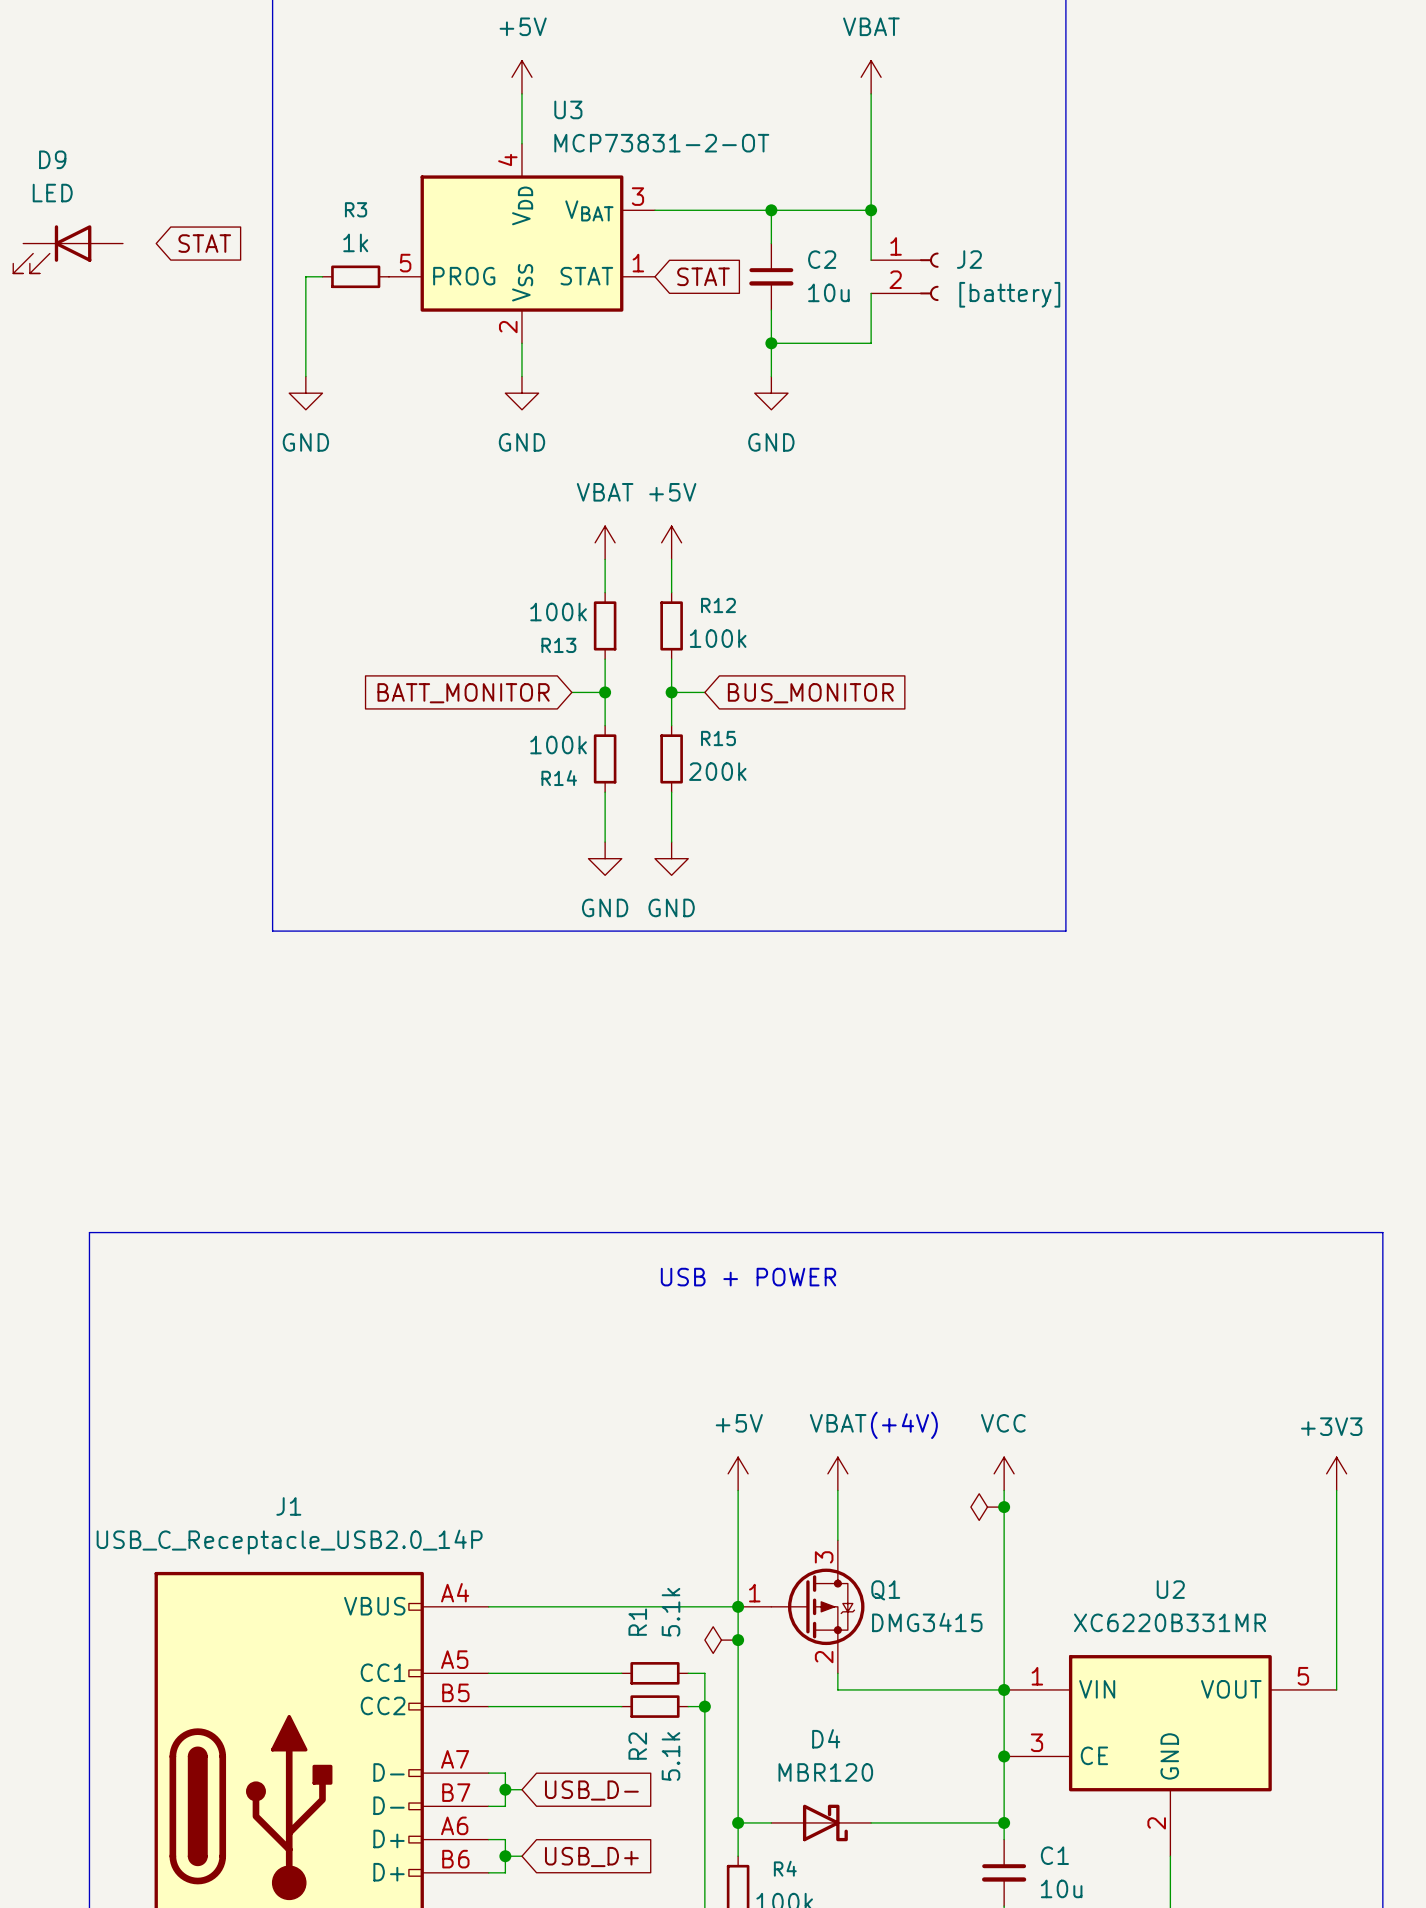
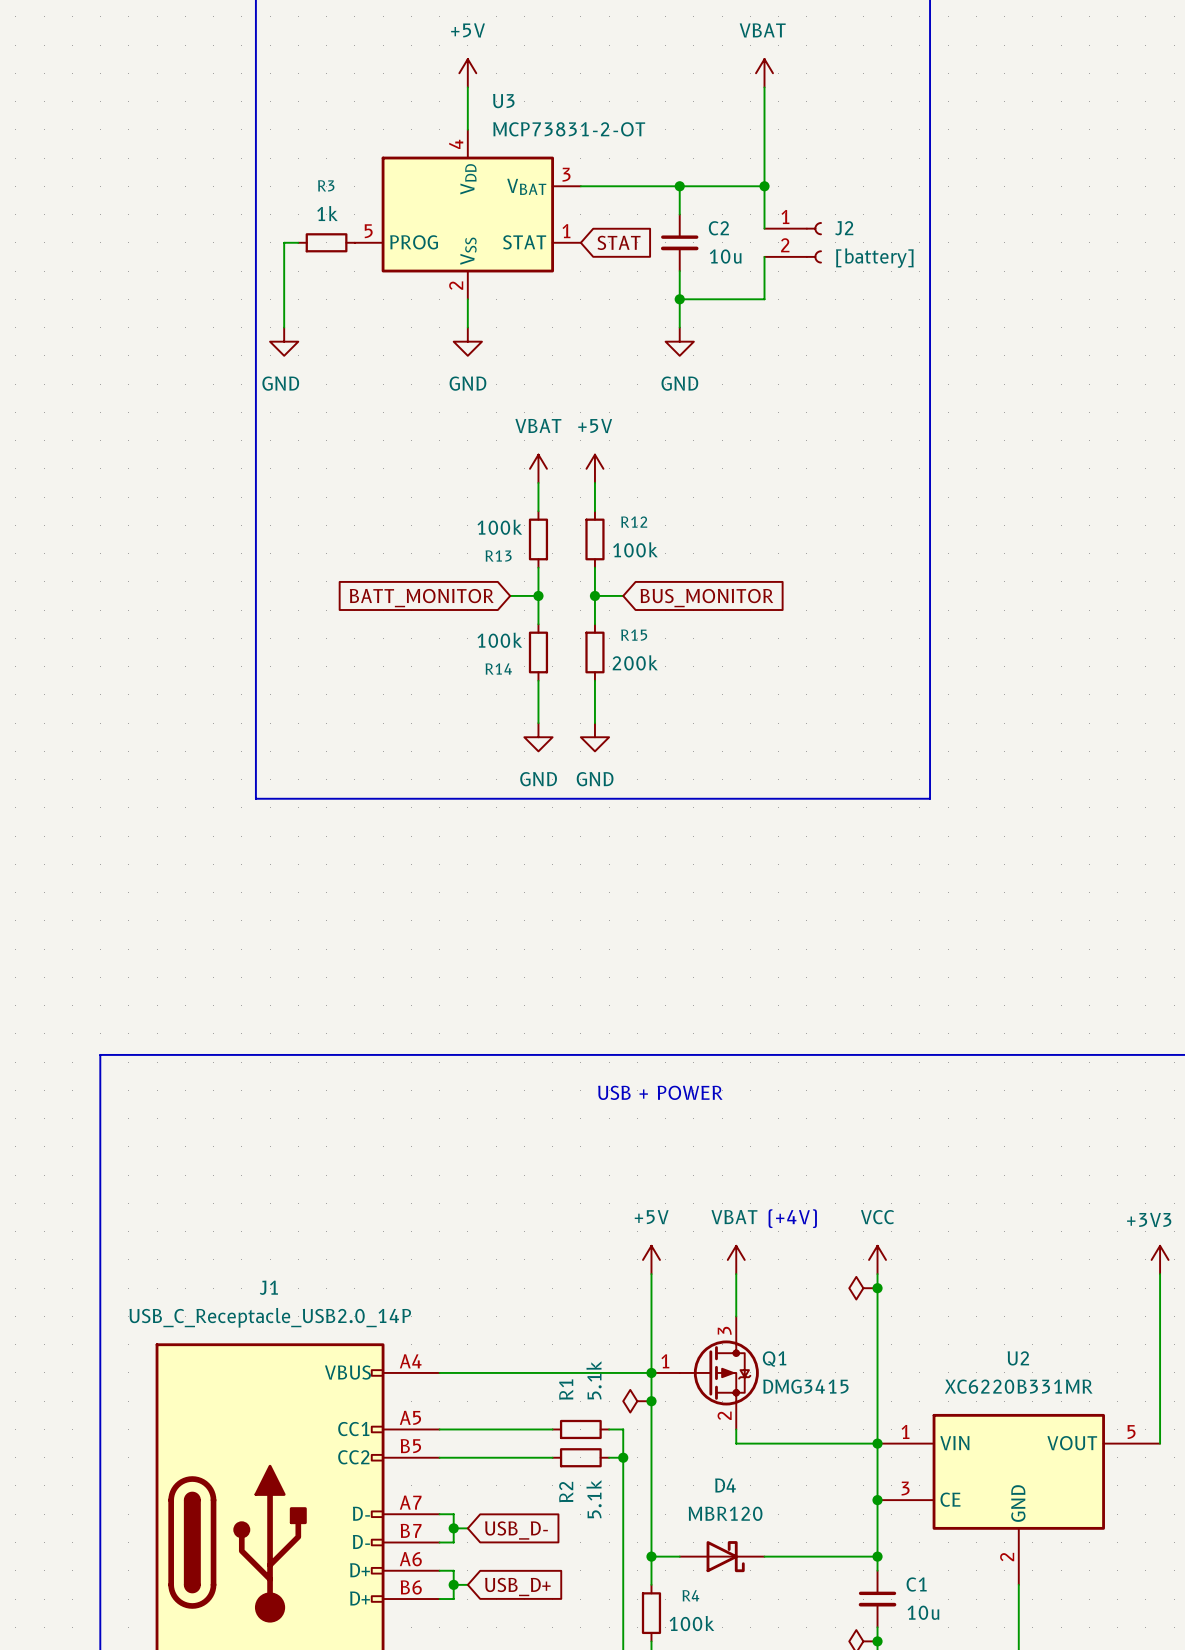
global label: STAT (204, 243) -> none
D9: LED (68, 249) -> none

